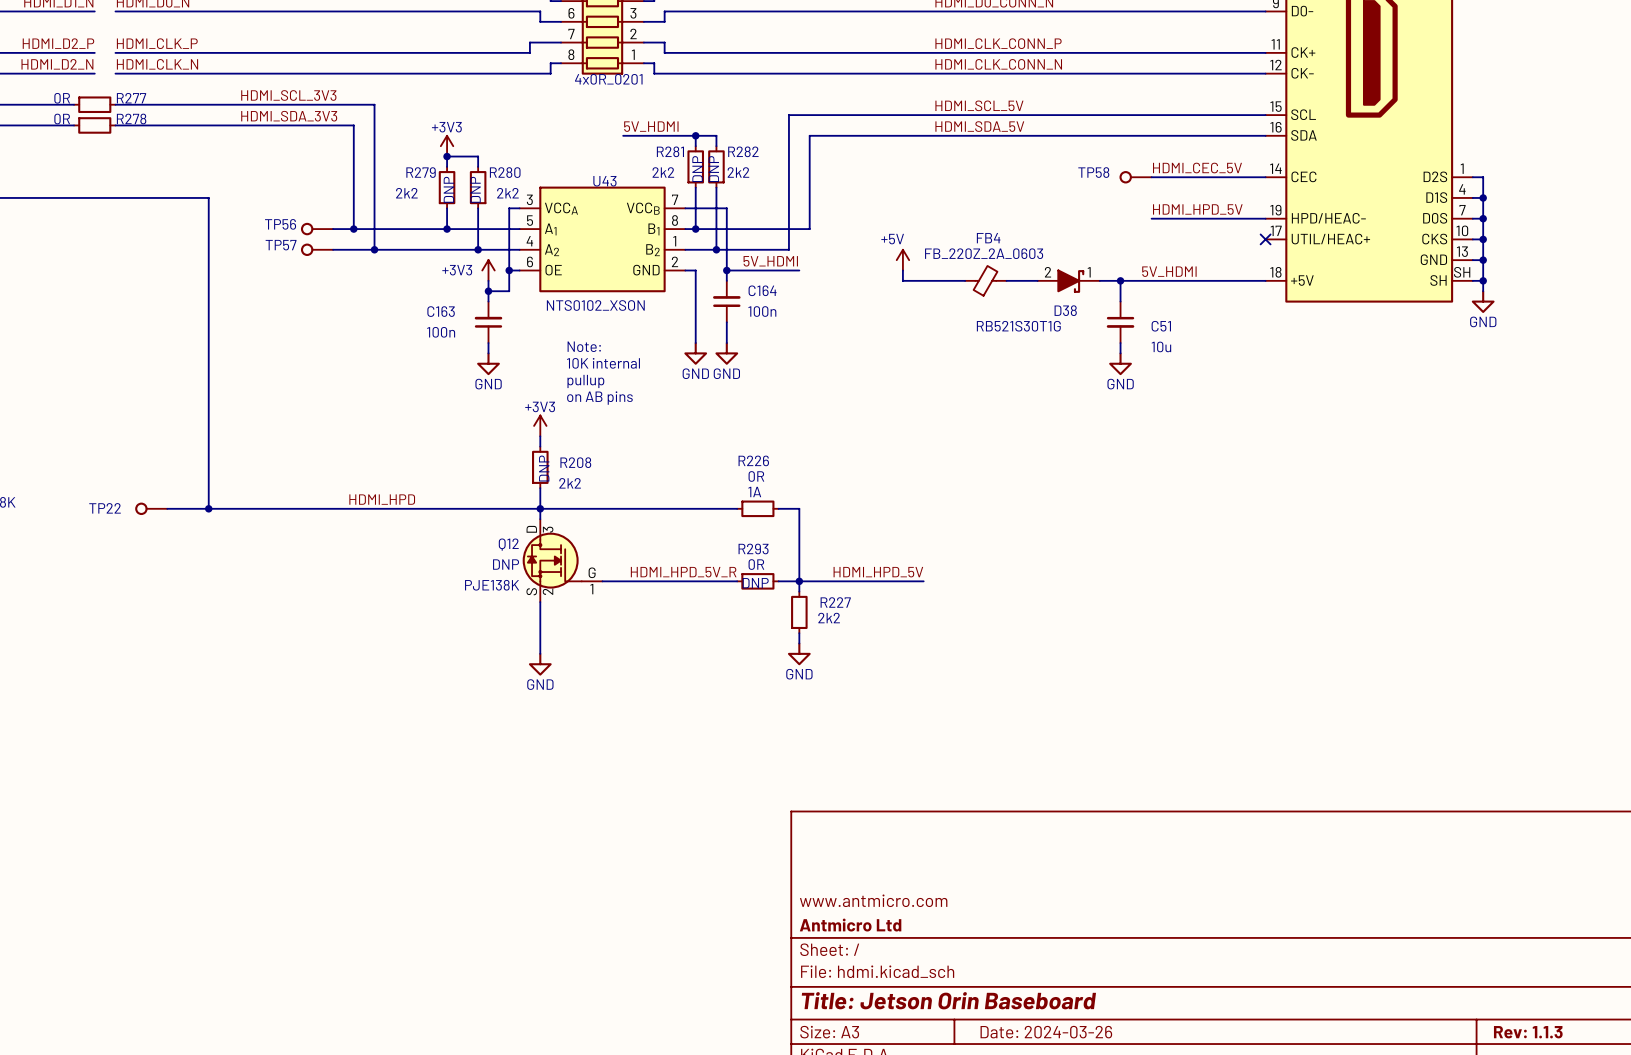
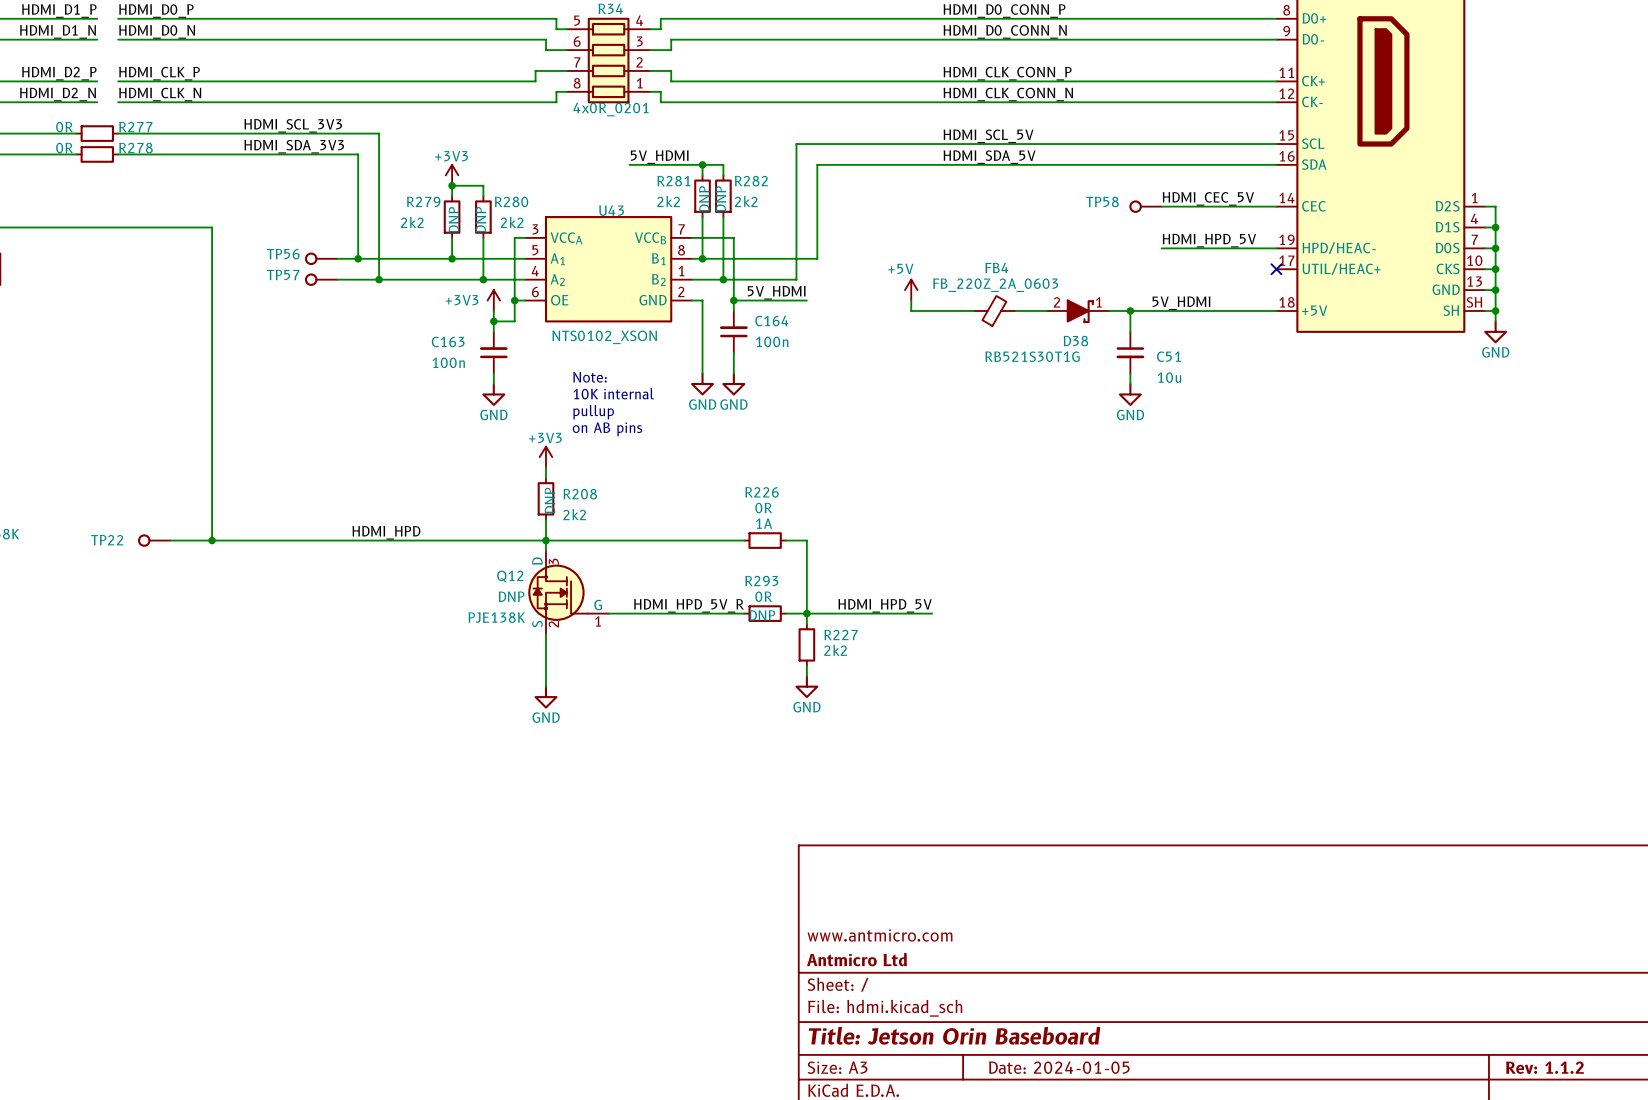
title block: Date: 2024-03-26 (1046, 1032) -> Date: 2024-01-05 (1059, 1067)
title block: Rev: 1.1.3 (1528, 1032) -> Rev: 1.1.2 (1544, 1067)

